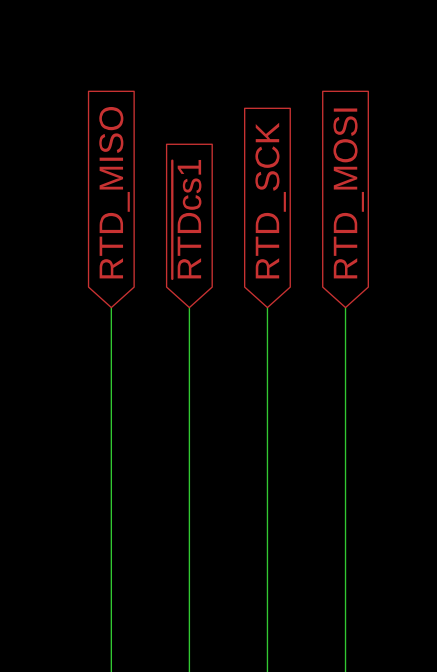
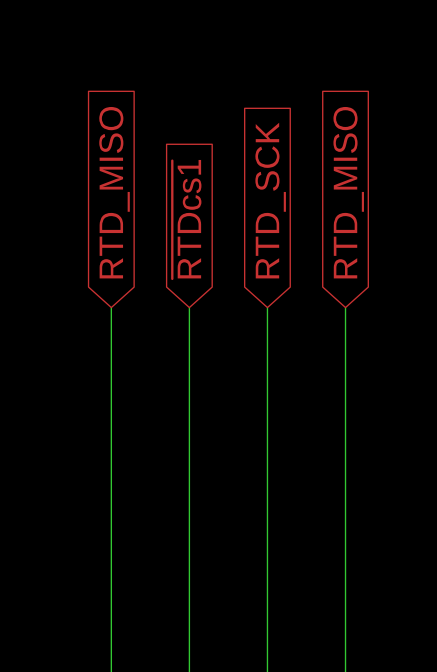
global label: RTD_MOSI (348, 193) -> RTD_MISO (348, 192)

